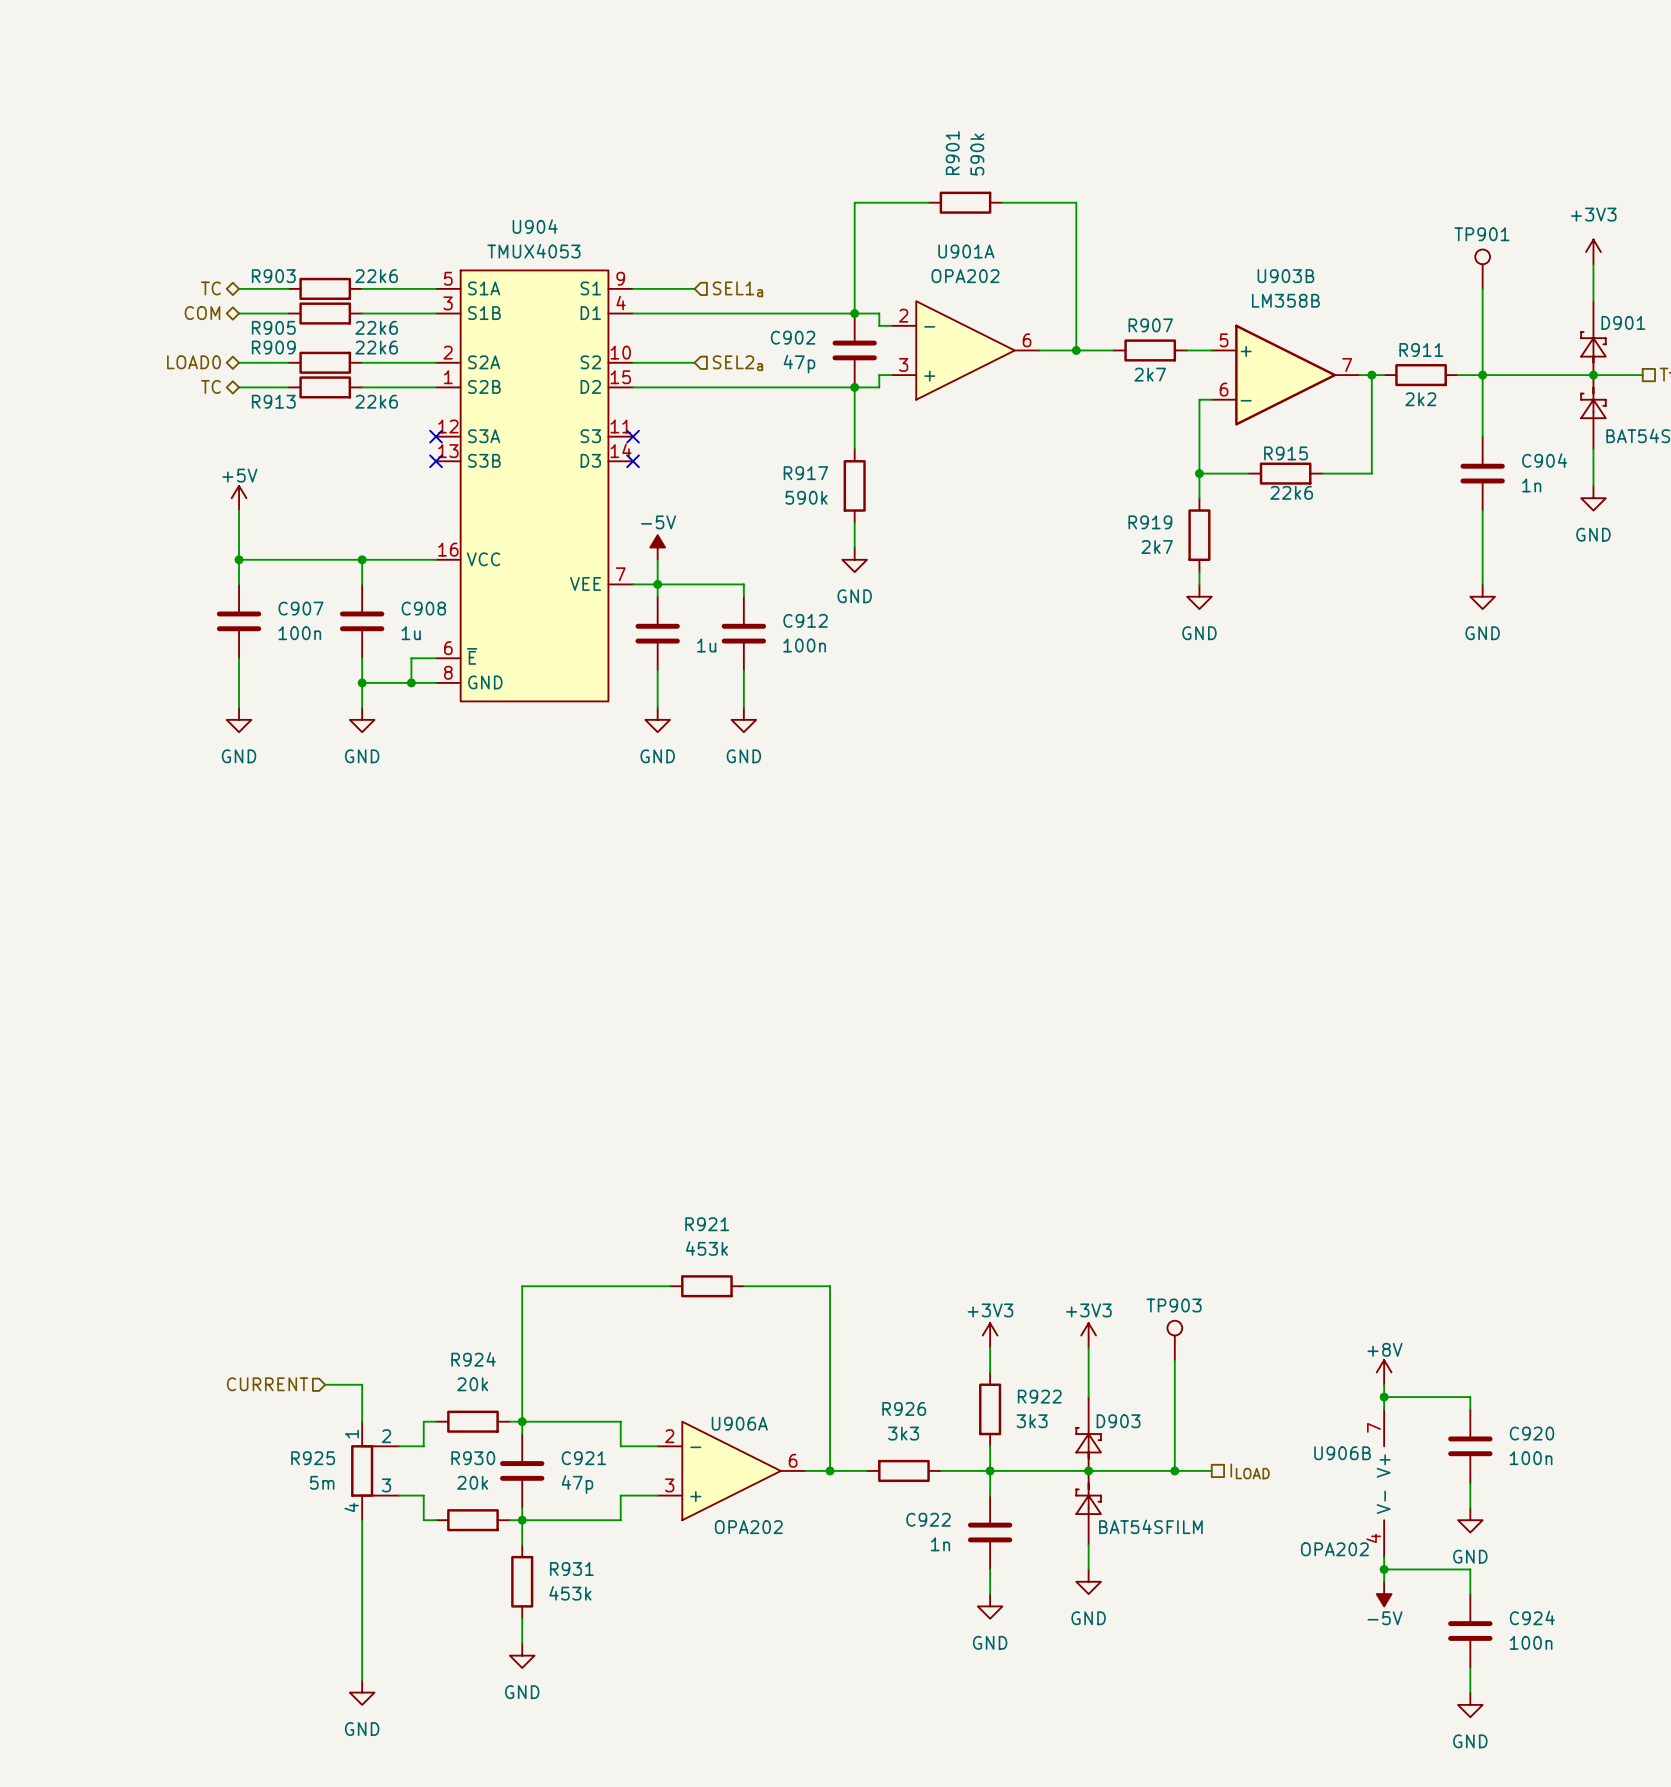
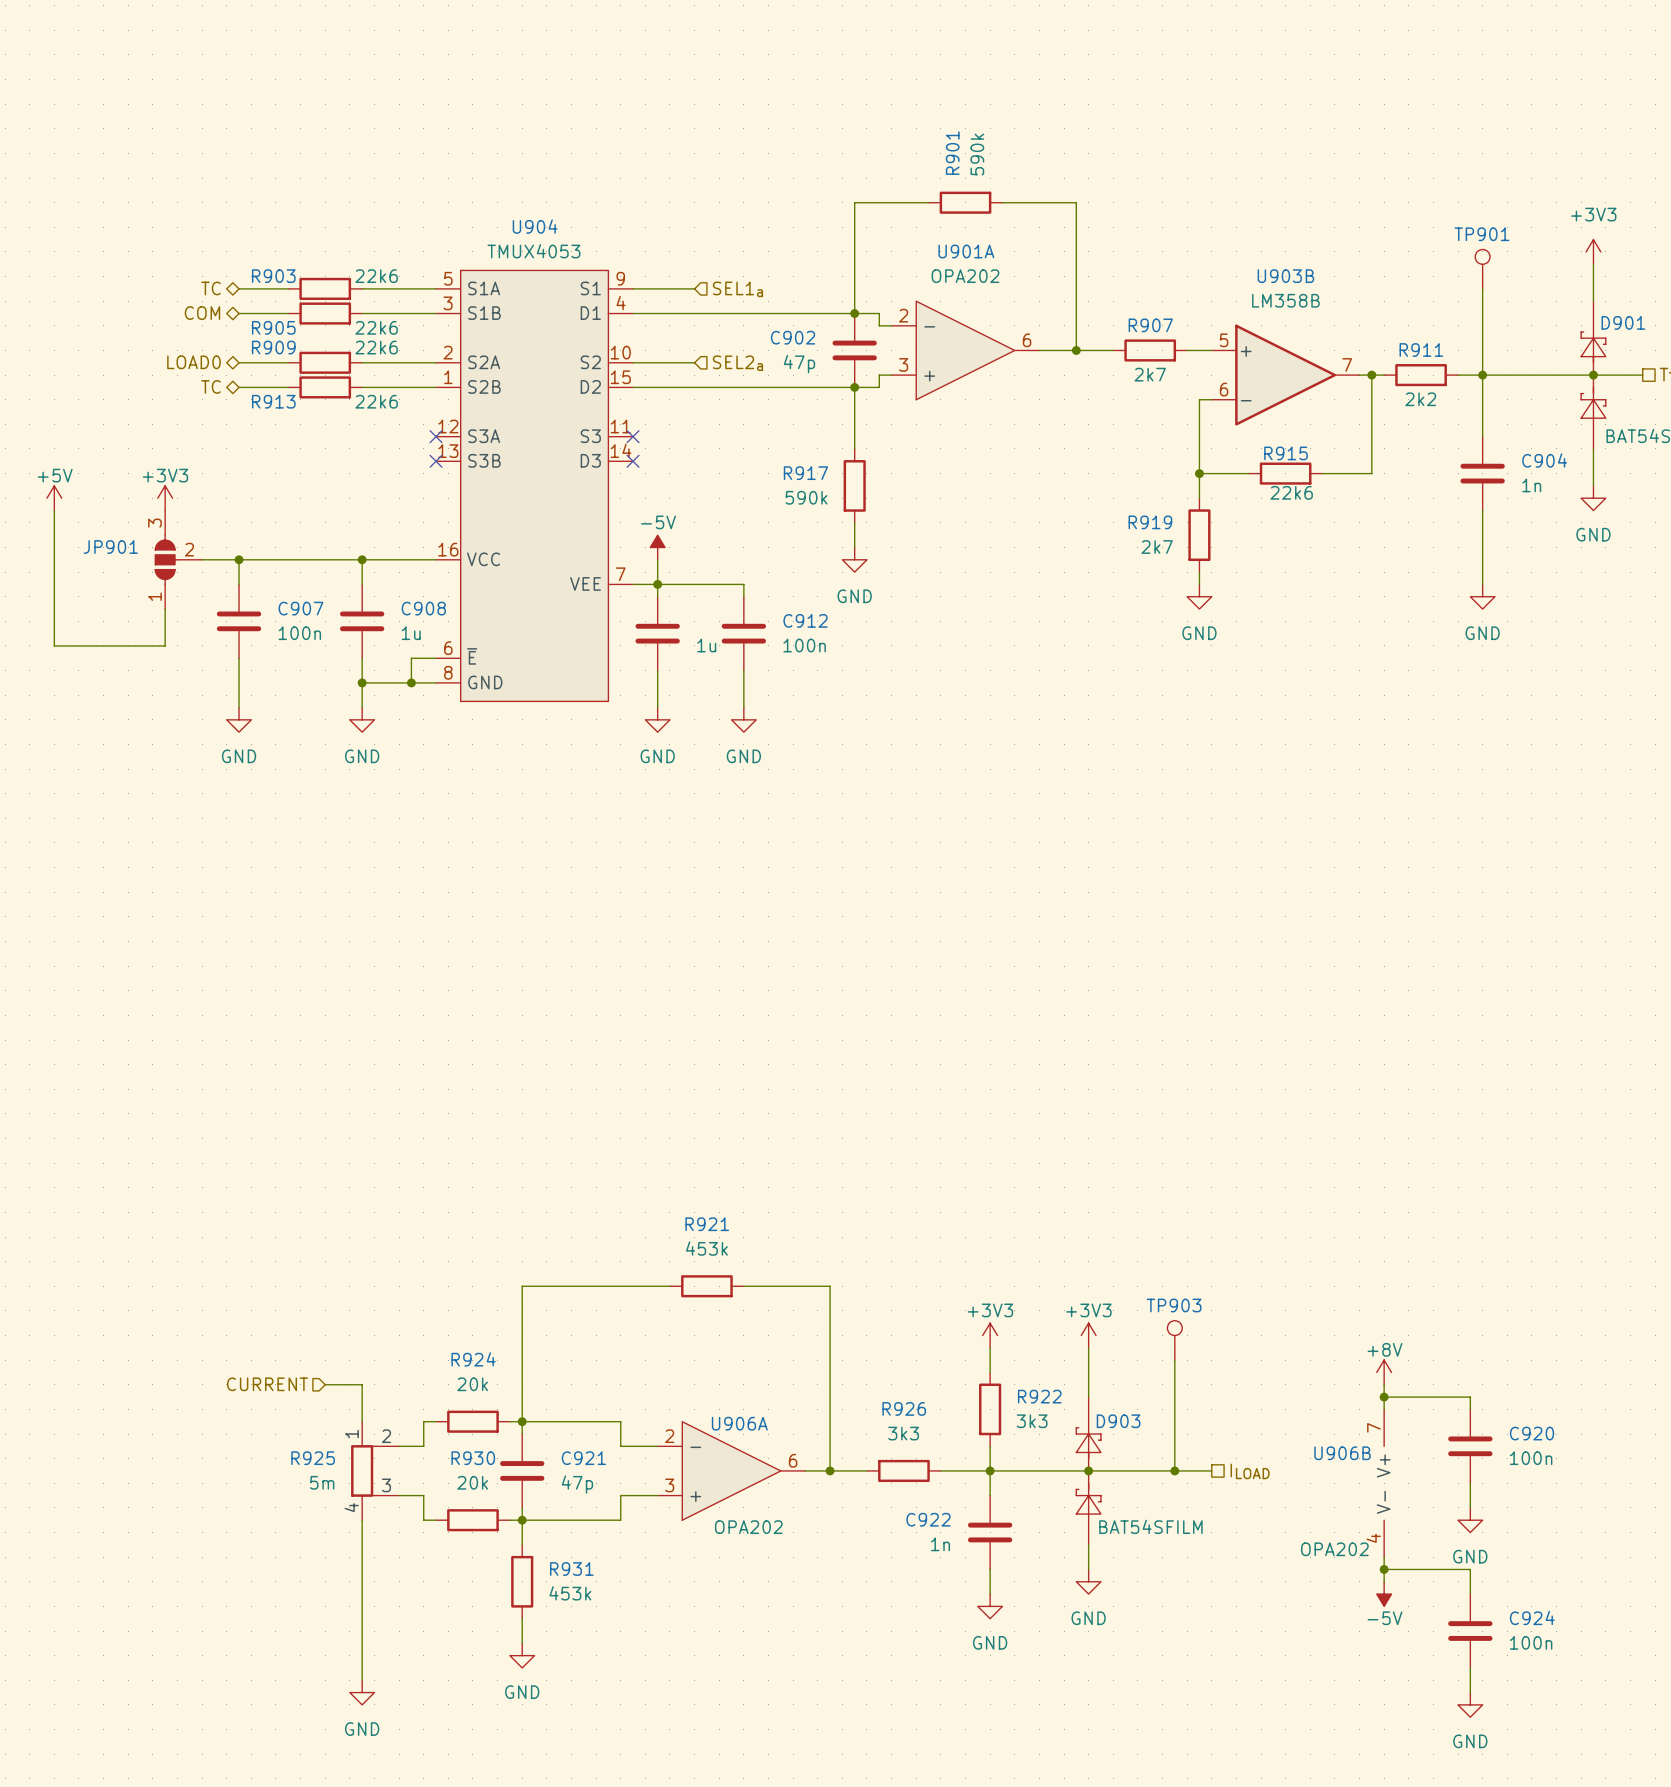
power symbol: none -> +3V3 (165, 498)
power symbol position: +5V (239, 498) -> +5V (54, 498)
wire: none -> (54, 510) (54, 645) (165, 645) (165, 609)
wire: (239, 510) (239, 559) -> (202, 559) (239, 559)
JP901: none -> (178, 559)

